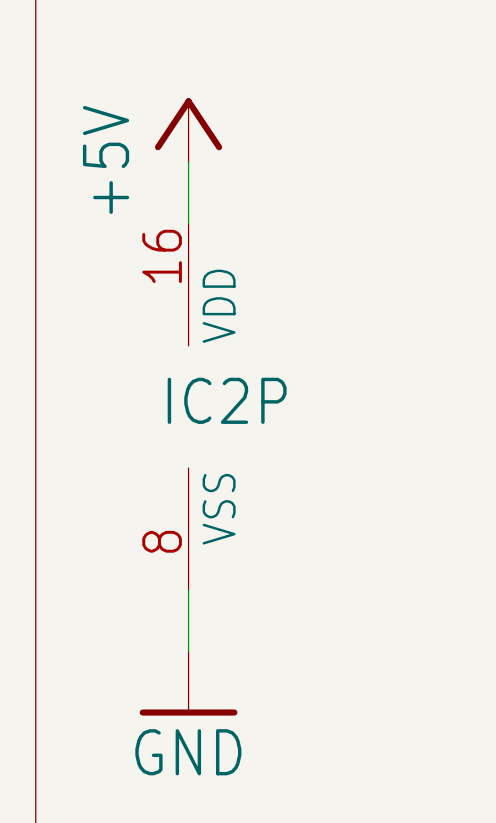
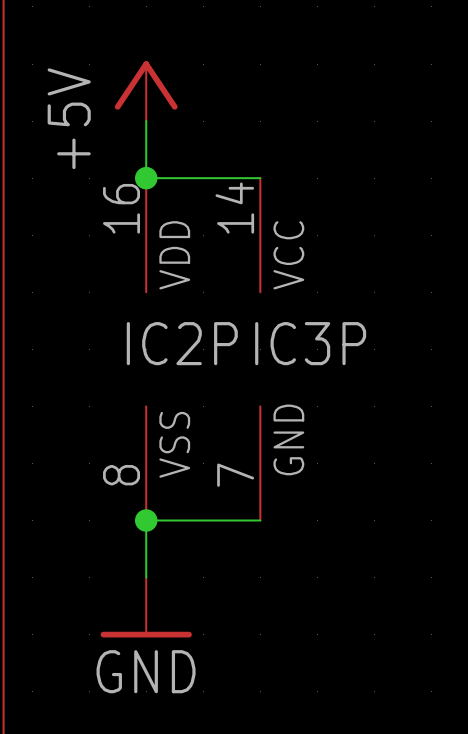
wire: none -> (146, 178) (260, 178)
junction: none -> (146, 178)
IC3P: none -> (260, 349)
wire: none -> (146, 520) (260, 520)
junction: none -> (146, 520)

